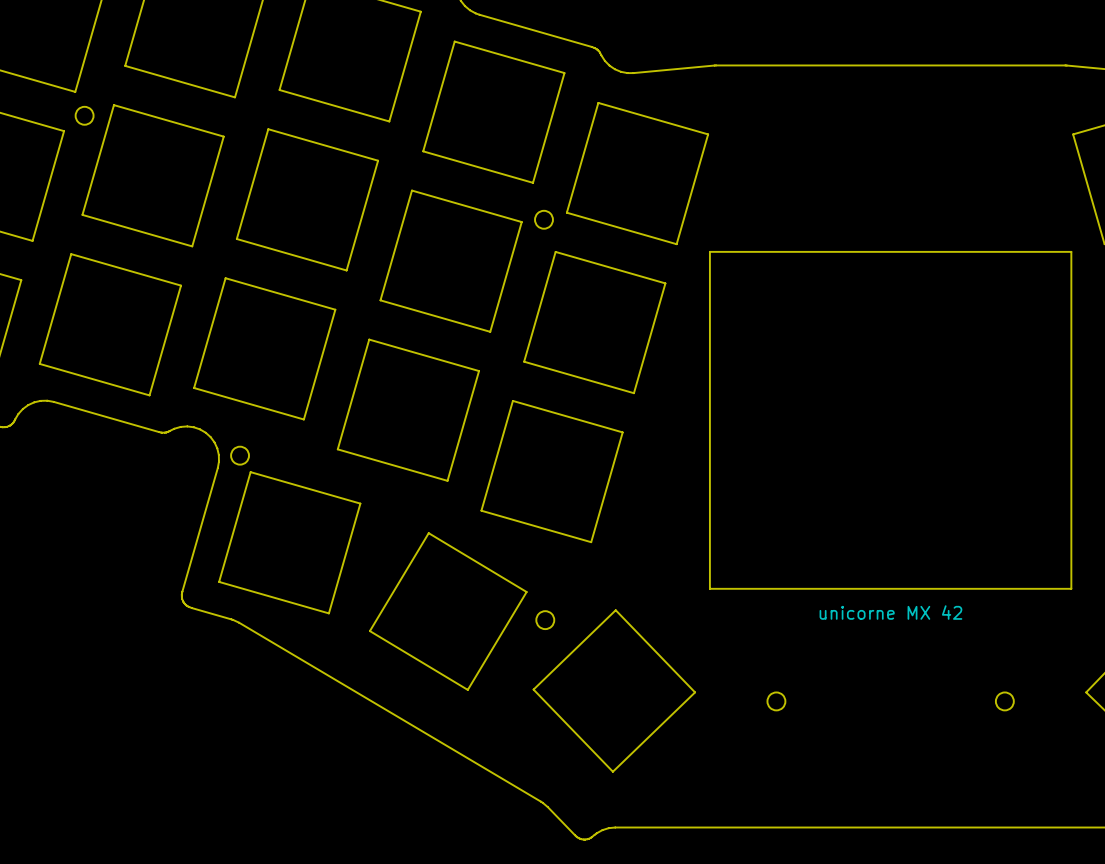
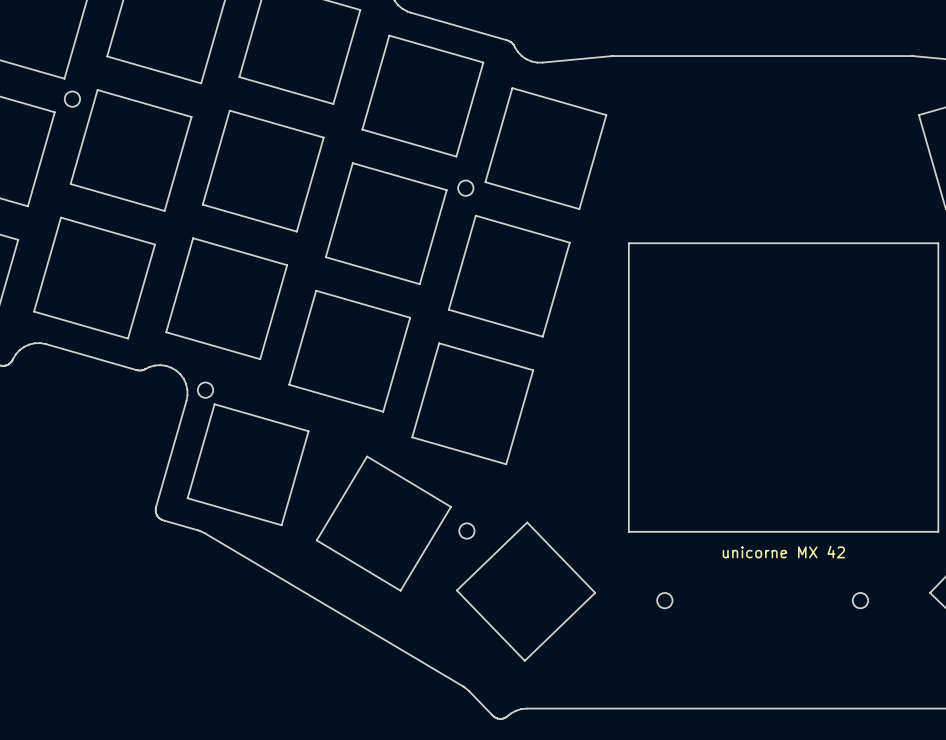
board edge: (709, 251) (1071, 251) (1071, 588) (709, 588) (709, 251) -> (628, 243) (938, 243) (938, 531) (628, 531) (628, 243)
text position: unicorne MX 42 (890, 612) -> unicorne MX 42 (783, 552)

